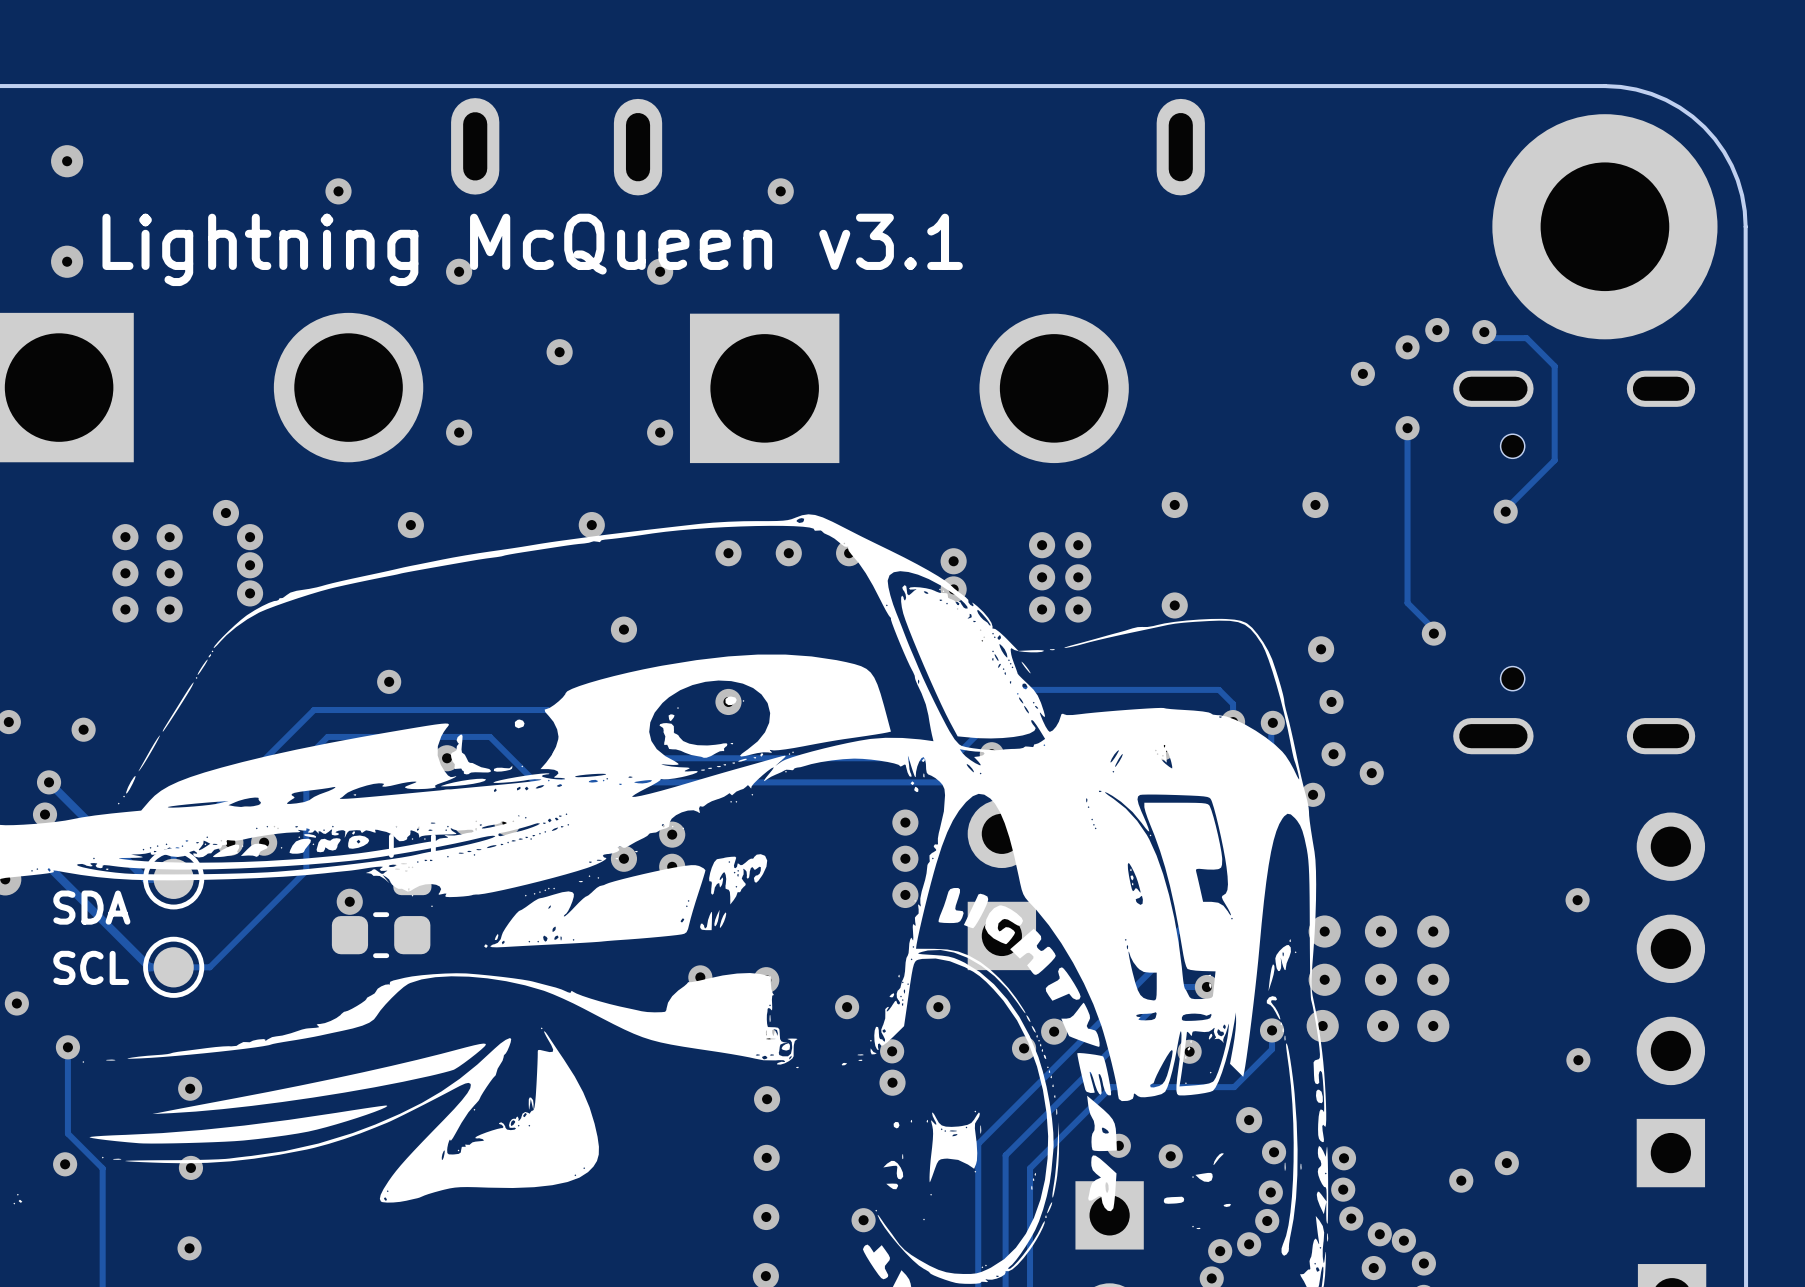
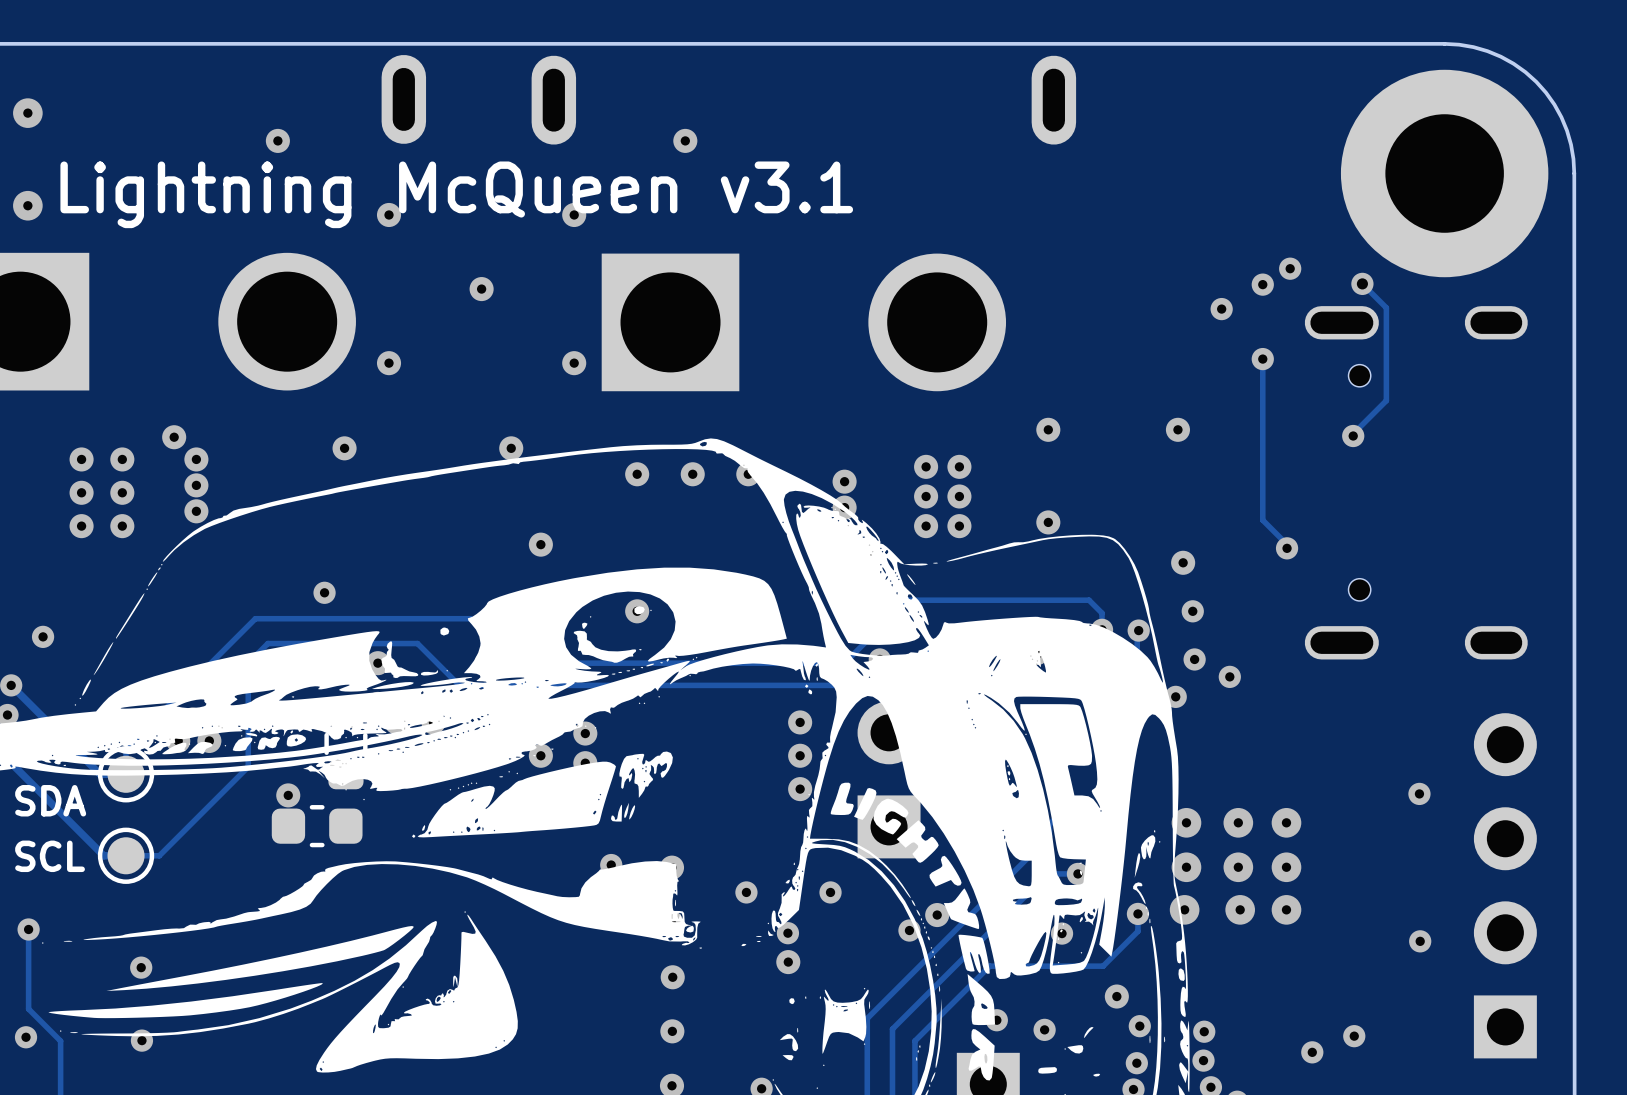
track: (1484, 332) (1490, 338) (1526, 338) (1554, 366) (1554, 460) (1541, 473) -> (1362, 283) (1386, 307) (1386, 400)
via: (1484, 332) -> none
via: none -> (1362, 283)

